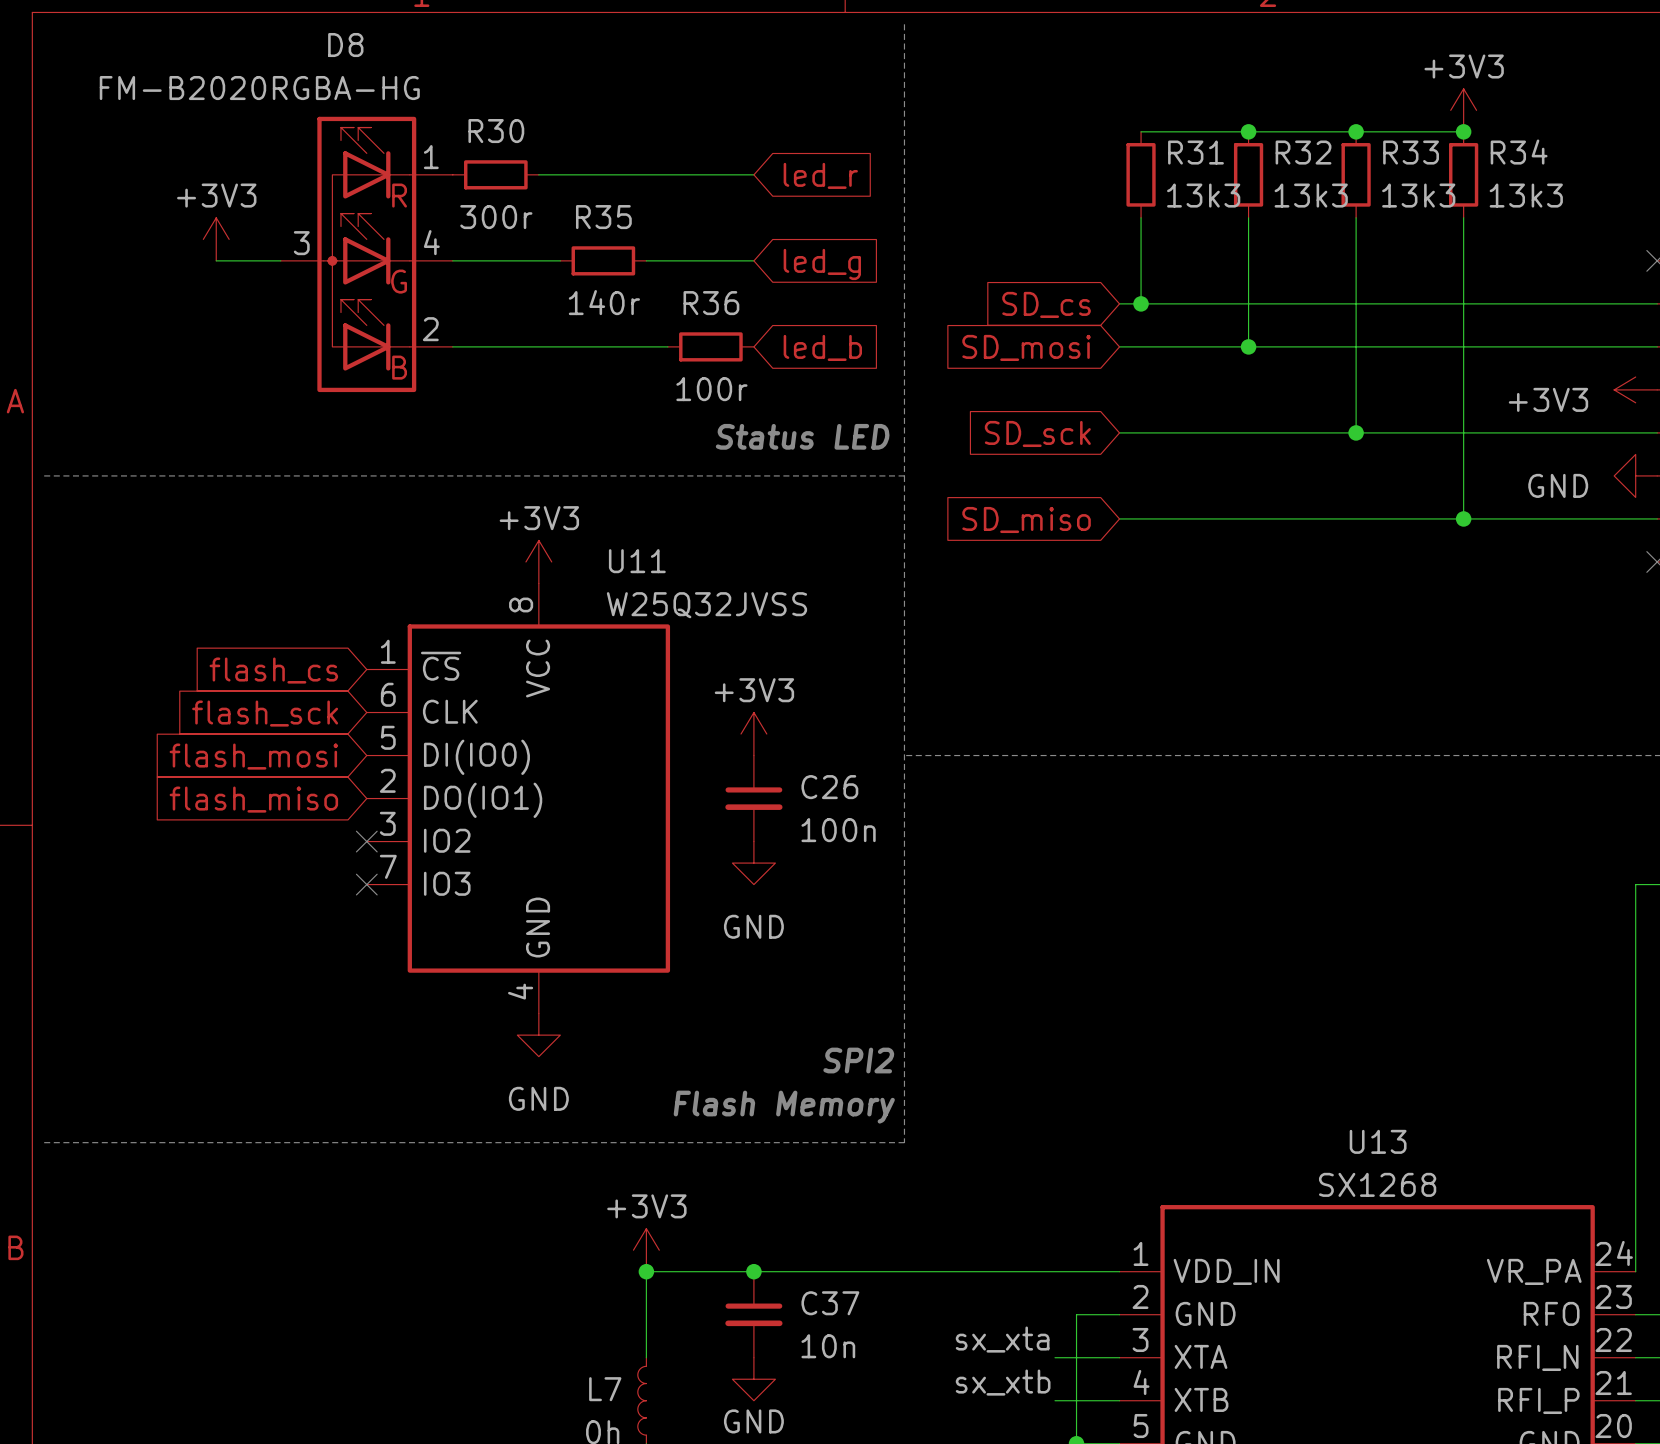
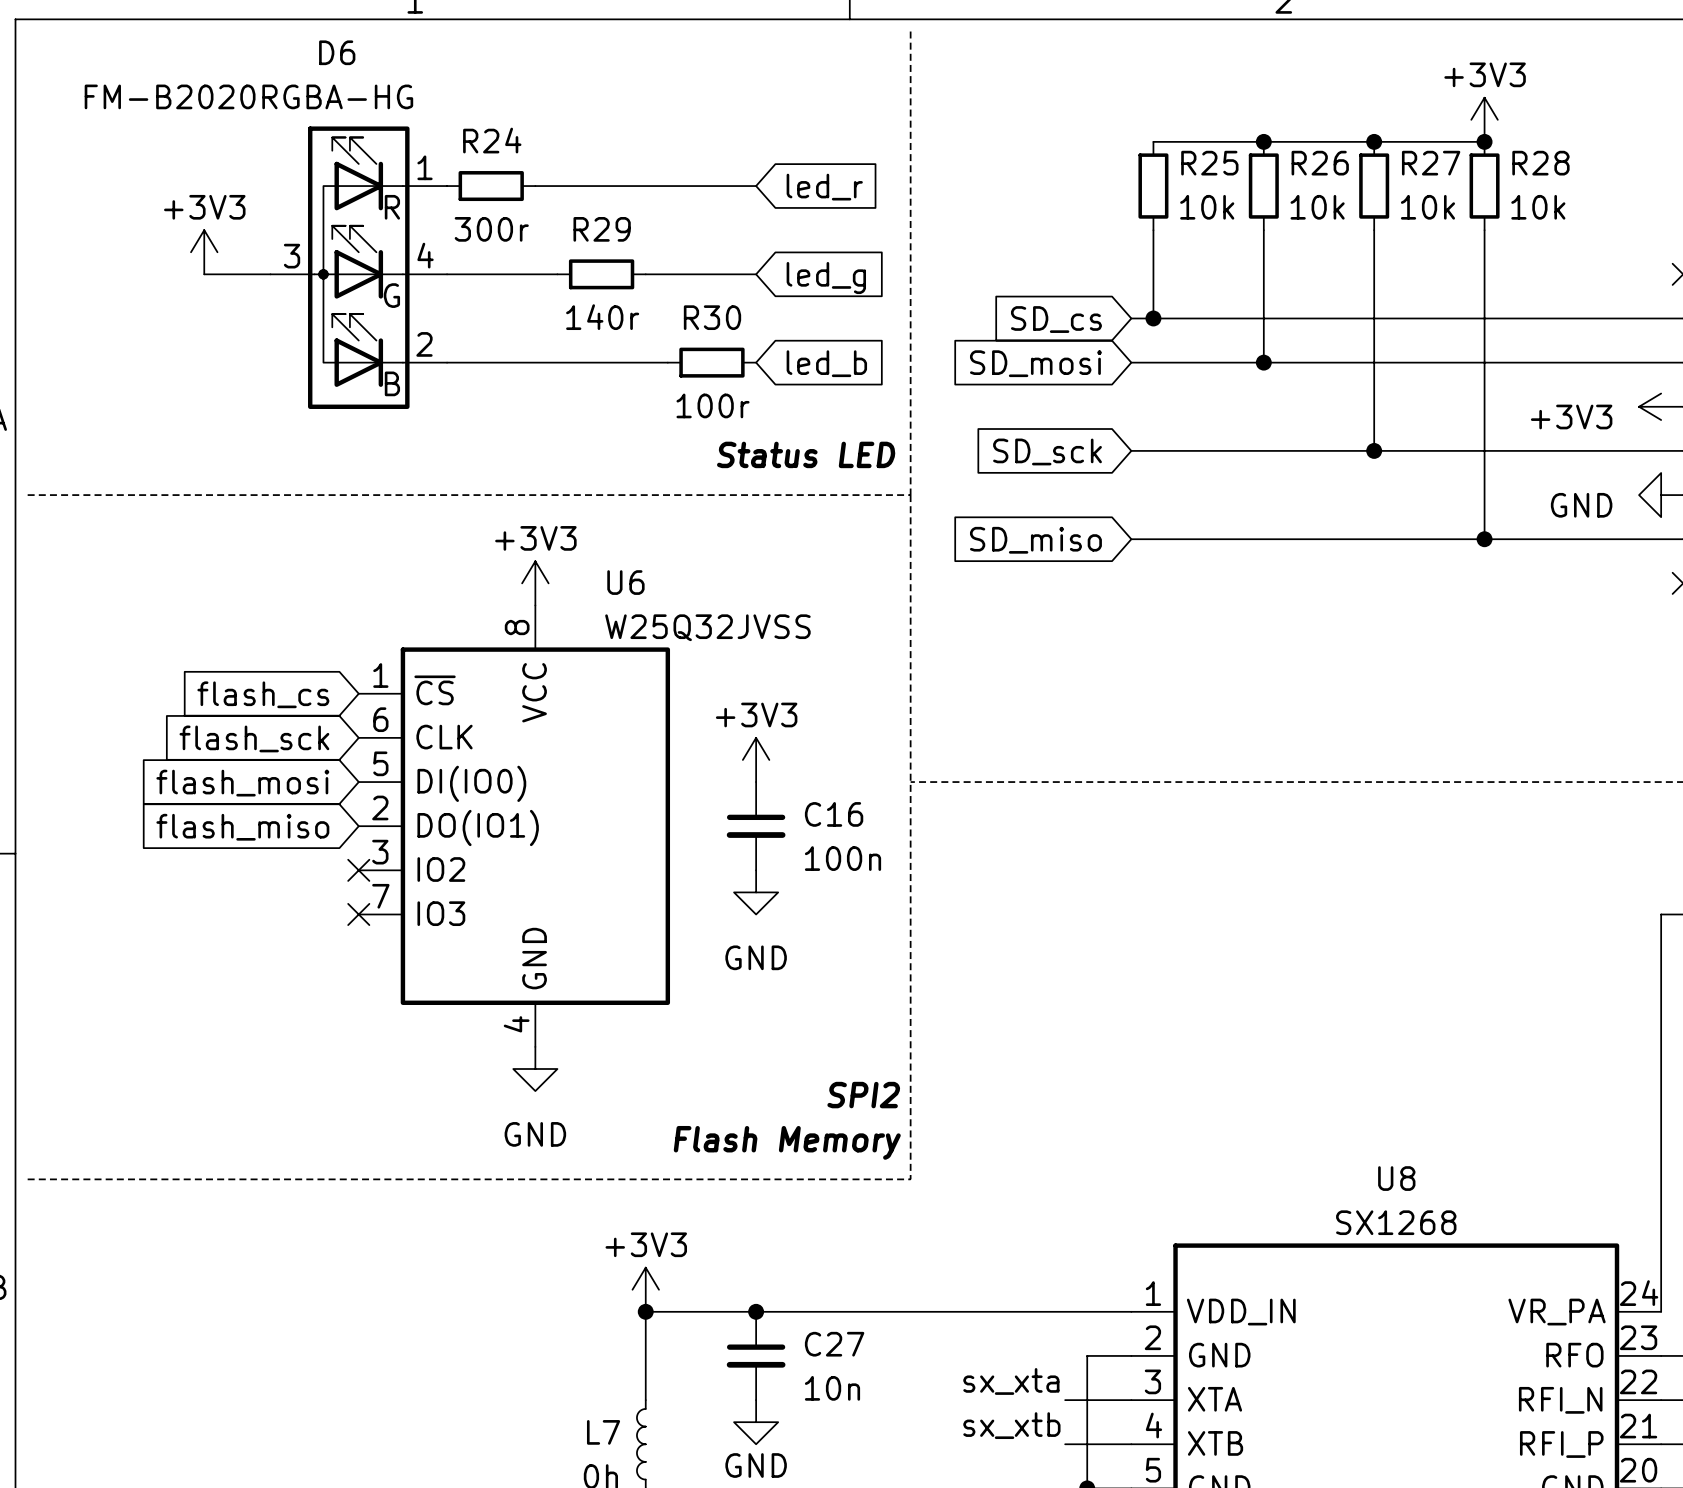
D8 name: D8 (345, 45) -> D6 (337, 52)
R30 name: R30 (496, 131) -> R24 (492, 140)
R31 name: R31 (1195, 152) -> R25 (1209, 163)
R32 name: R32 (1303, 152) -> R26 (1320, 163)
R33 name: R33 (1411, 152) -> R27 (1431, 163)
R34 name: R34 (1519, 152) -> R28 (1540, 163)
R31 value: 13k3 (1203, 195) -> 10k (1207, 207)
R32 value: 13k3 (1311, 195) -> 10k (1317, 207)
R33 value: 13k3 (1418, 195) -> 10k (1427, 207)
R34 value: 13k3 (1526, 195) -> 10k (1538, 207)
R35 name: R35 (603, 217) -> R29 (602, 229)
R36 name: R36 (711, 303) -> R30 (712, 317)
U11 name: U11 (637, 561) -> U6 (625, 582)
C26 name: C26 (829, 787) -> C16 (834, 814)
U13 name: U13 (1378, 1141) -> U8 (1396, 1178)
C37 name: C37 (830, 1303) -> C27 (834, 1344)

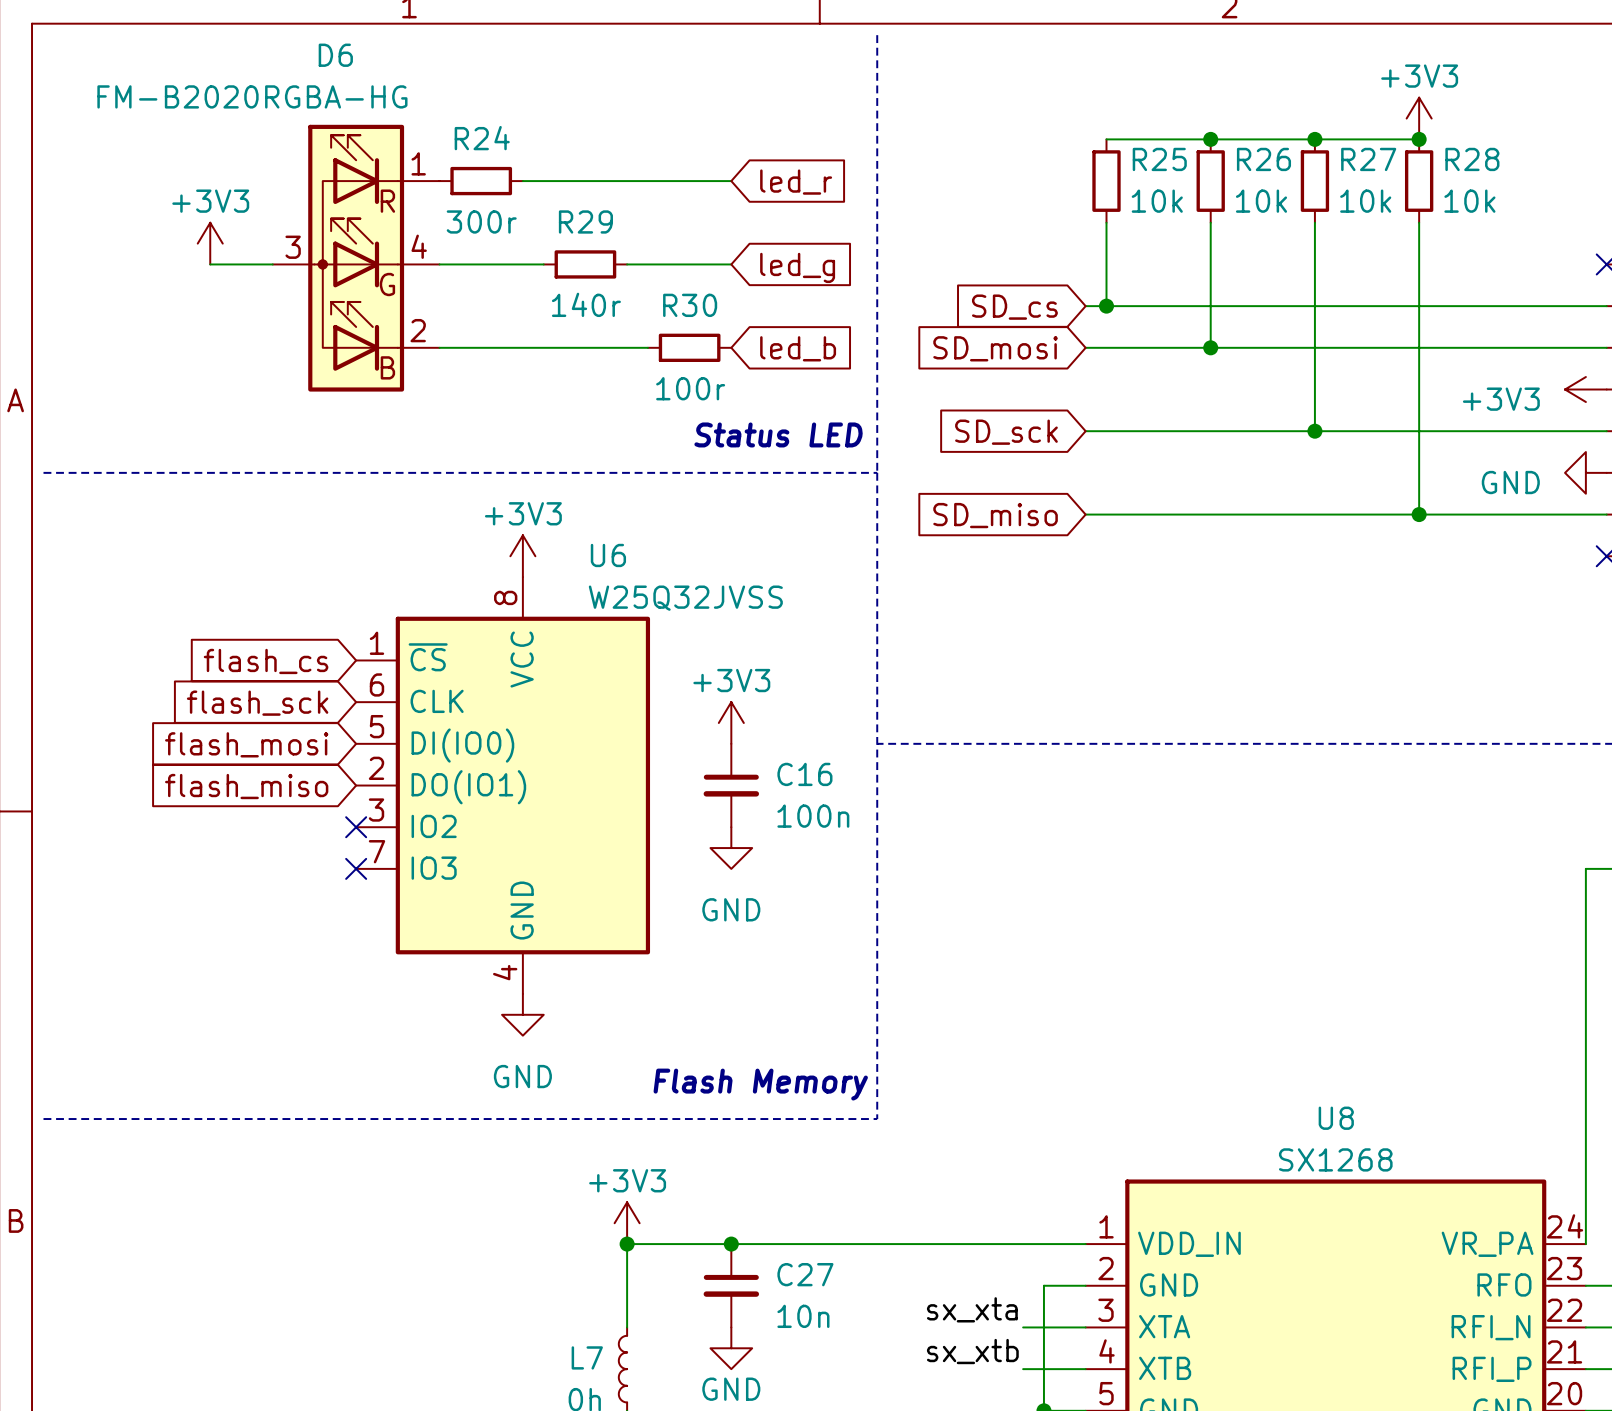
text: SPI2 (863, 1095) -> none

